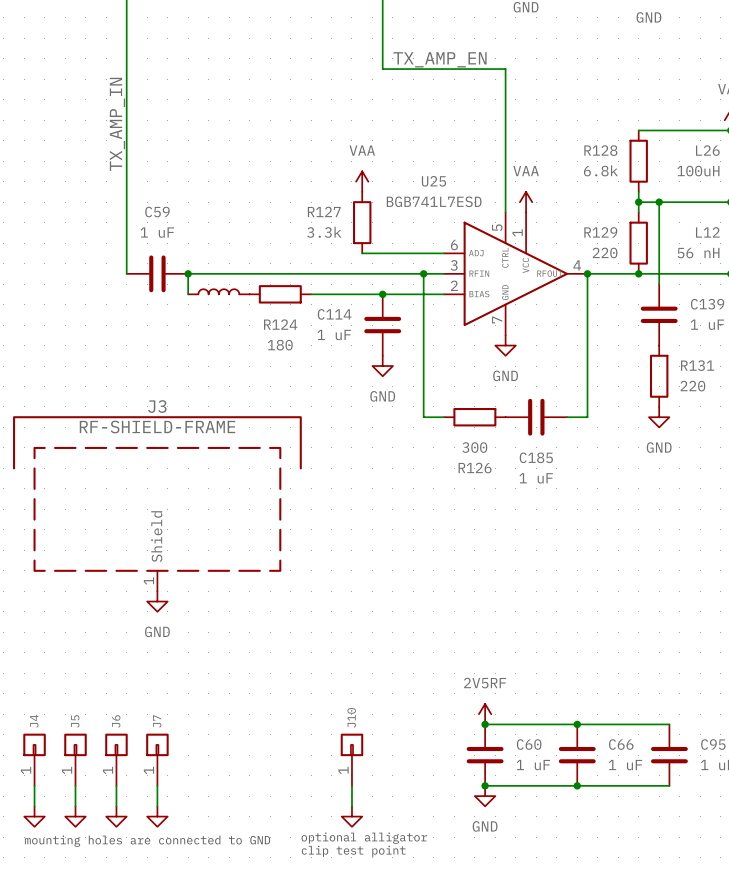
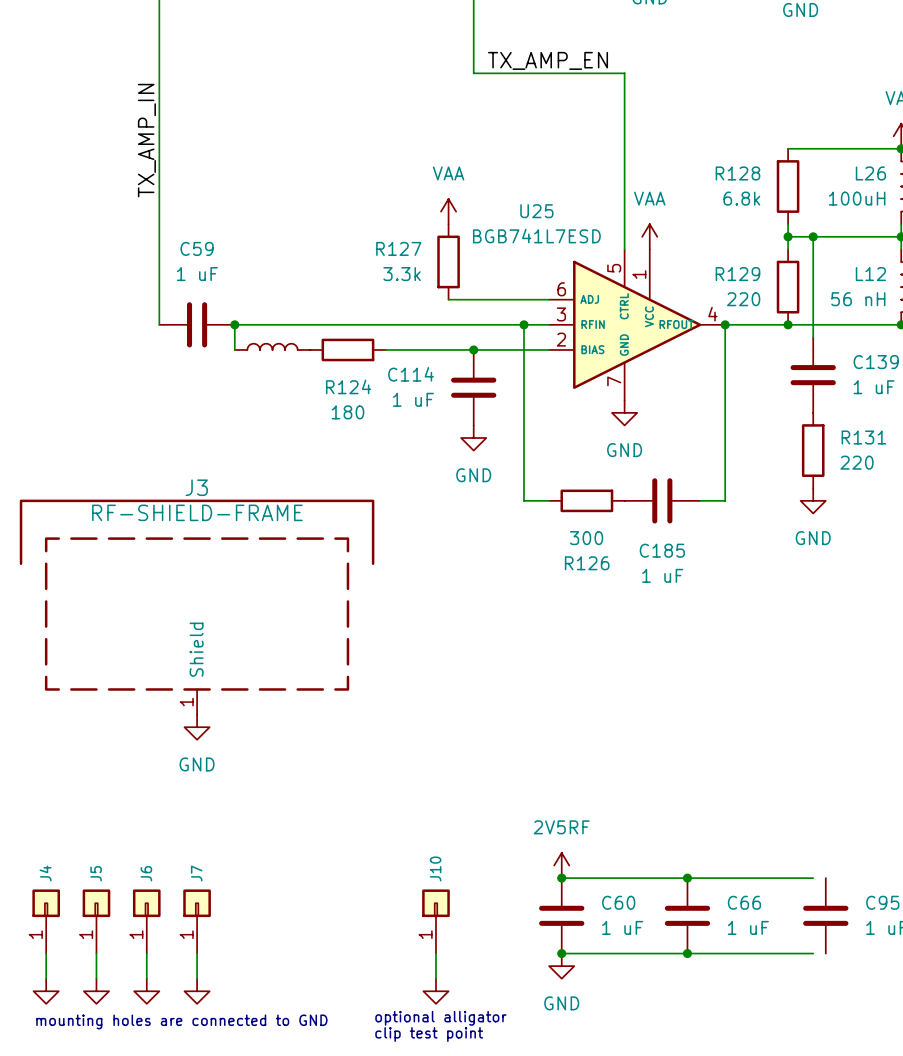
power symbol position: 2V5RF (485, 714) -> 2V5RF (561, 865)
wire: none -> (561, 878) (599, 878)
junction position: (485, 724) -> (561, 878)
junction position: (577, 724) -> (687, 878)
wire: (659, 724) (669, 724) -> none
C60 position: (485, 755) -> (561, 915)
C66 position: (577, 755) -> (687, 915)
wire: none -> (561, 953) (599, 953)
junction position: (485, 785) -> (561, 953)
junction position: (577, 785) -> (687, 953)
wire: (659, 785) (669, 785) -> none
power symbol position: GND (485, 796) -> GND (561, 966)

